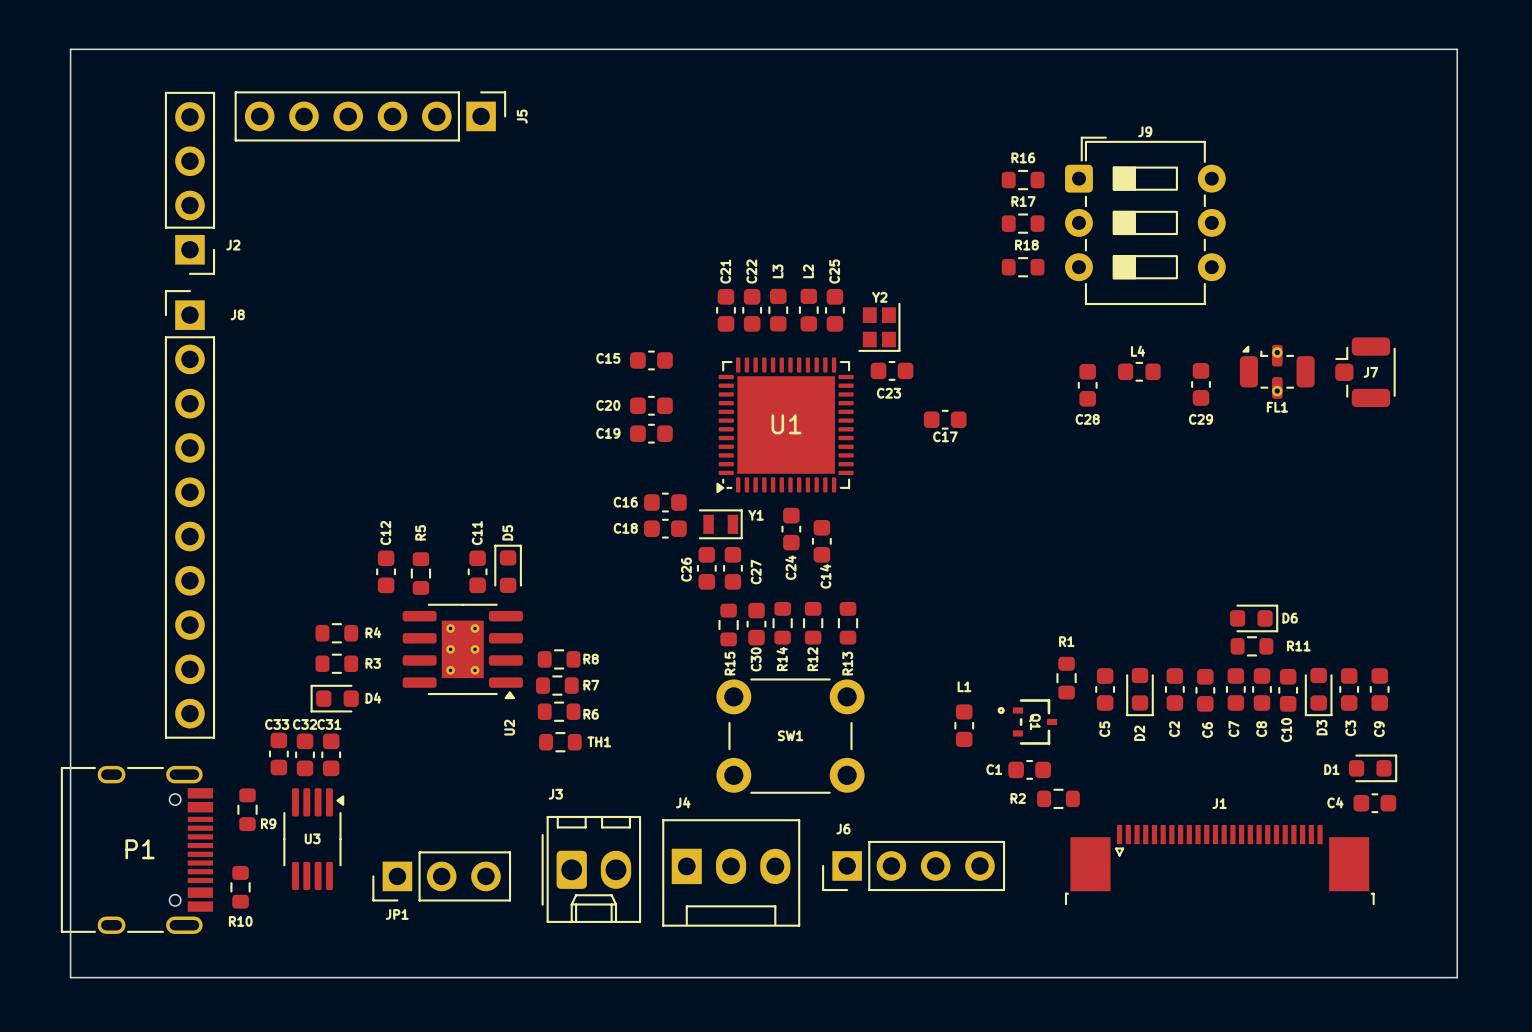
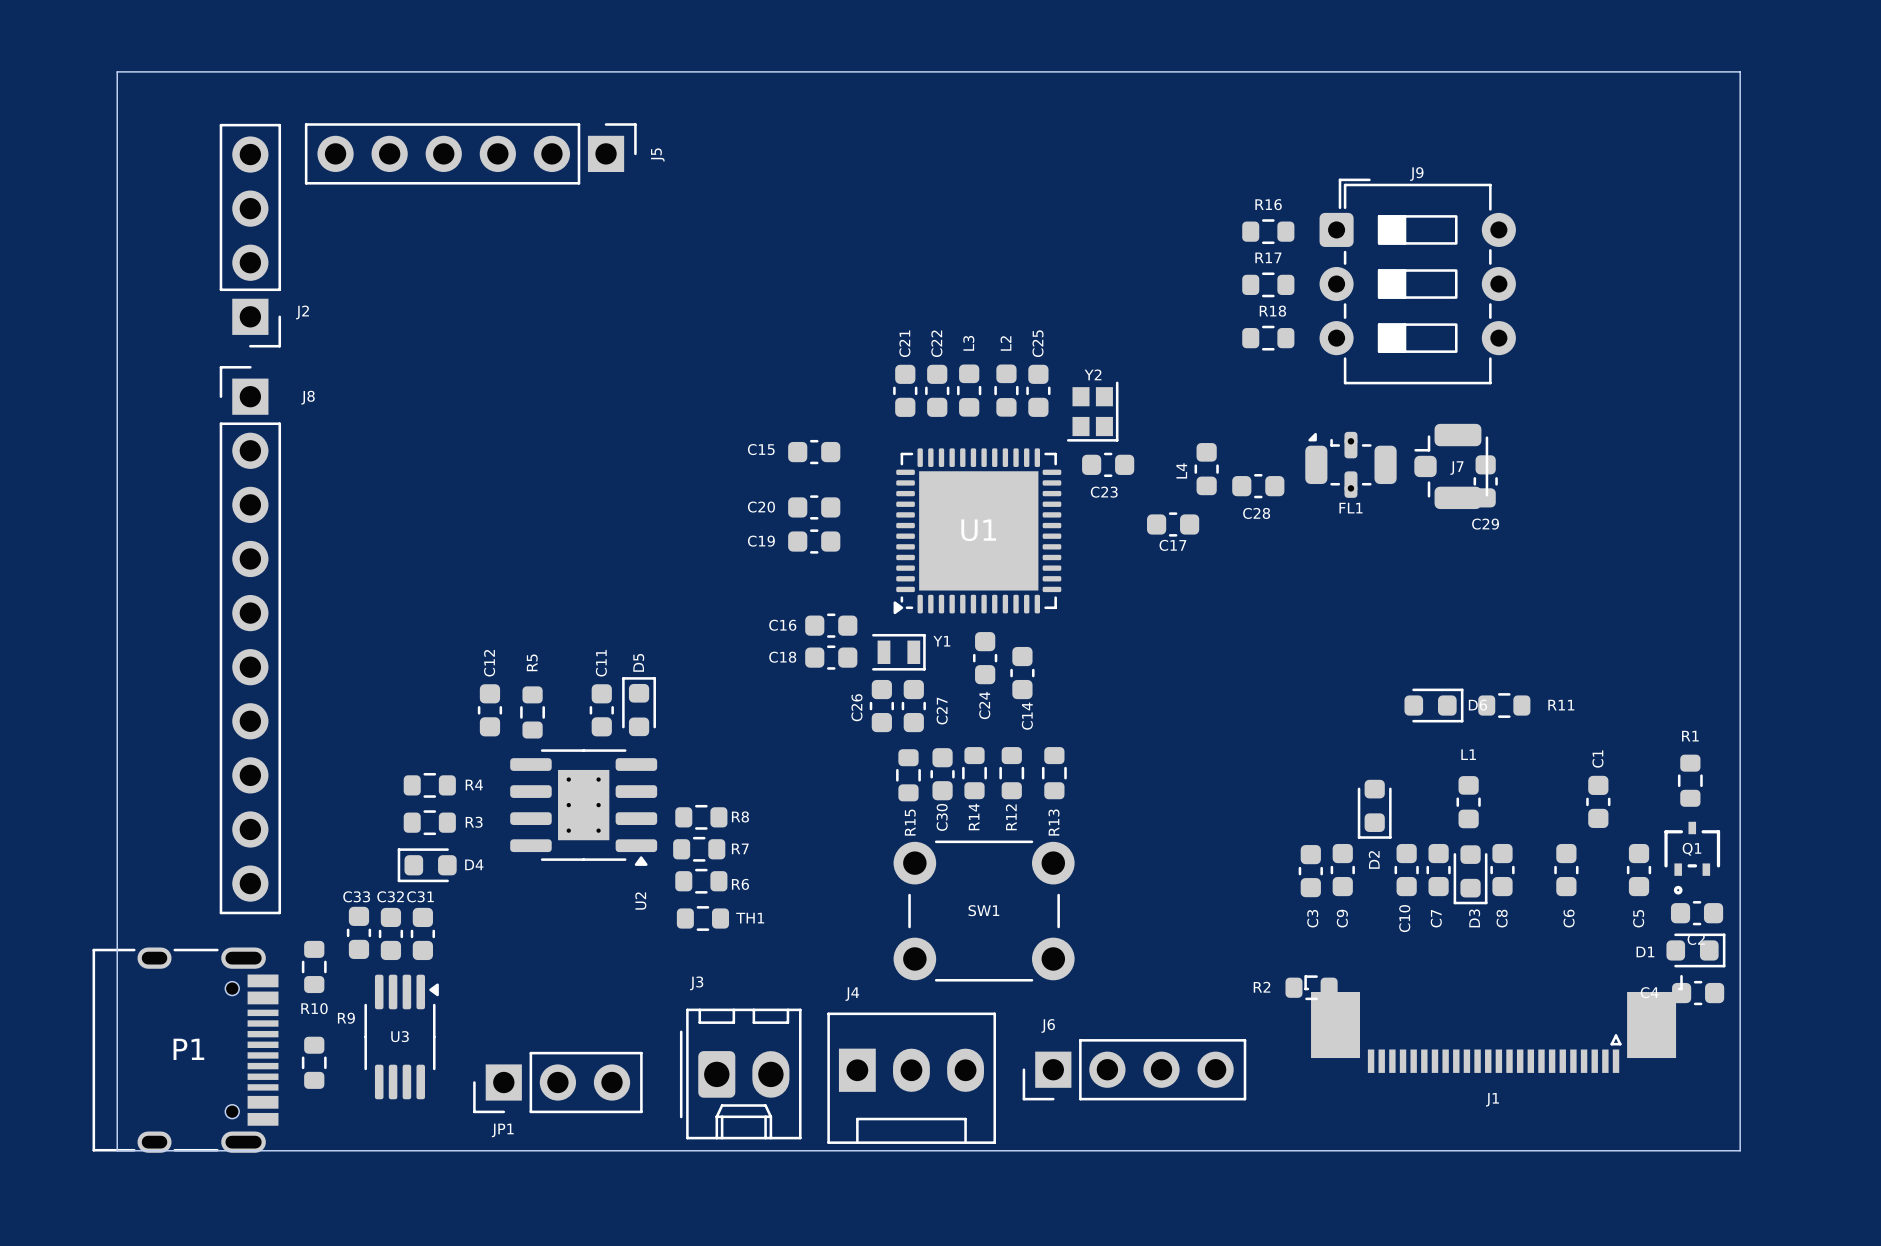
board edge: (81, 49) (70, 49) (70, 977) (1457, 977) (1457, 49) (1409, 49) -> (117, 71) (117, 1150) (1740, 1150) (1740, 71)
L4 rotation: 0° (1139, 371) -> 90° clockwise (1206, 469)
L4 position: (1139, 371) -> (1206, 469)
FL1 position: (1277, 371) -> (1350, 464)
J7 position: (1365, 372) -> (1451, 466)
C28 rotation: 0° (1087, 385) -> 90° clockwise (1258, 486)
C28 position: (1087, 385) -> (1258, 486)
D6 position: (1254, 618) -> (1433, 705)
R11 position: (1251, 646) -> (1504, 705)
R1 position: (1066, 678) -> (1690, 780)
C5 position: (1105, 689) -> (1639, 870)
C2 rotation: 0° (1174, 689) -> 90° clockwise (1697, 913)
C2 position: (1174, 689) -> (1697, 913)
C7 position: (1235, 689) -> (1438, 870)
C8 position: (1262, 689) -> (1502, 870)
C3 position: (1349, 689) -> (1310, 871)
C9 position: (1379, 689) -> (1342, 870)
C6 position: (1205, 690) -> (1566, 870)
C10 position: (1288, 690) -> (1406, 870)
D2 position: (1139, 692) -> (1374, 809)
D3 position: (1318, 692) -> (1470, 874)
Q1 rotation: 0° (1027, 721) -> 90° counterclockwise (1692, 858)
Q1 position: (1027, 721) -> (1692, 858)
L1 position: (964, 725) -> (1468, 802)
C1 rotation: 0° (1029, 769) -> 90° clockwise (1598, 801)
C1 position: (1029, 769) -> (1598, 801)
R9 position: (247, 809) -> (314, 1062)
J1 rotation: 0° (1219, 865) -> 180° (1493, 1023)
R10 position: (240, 887) -> (314, 966)

